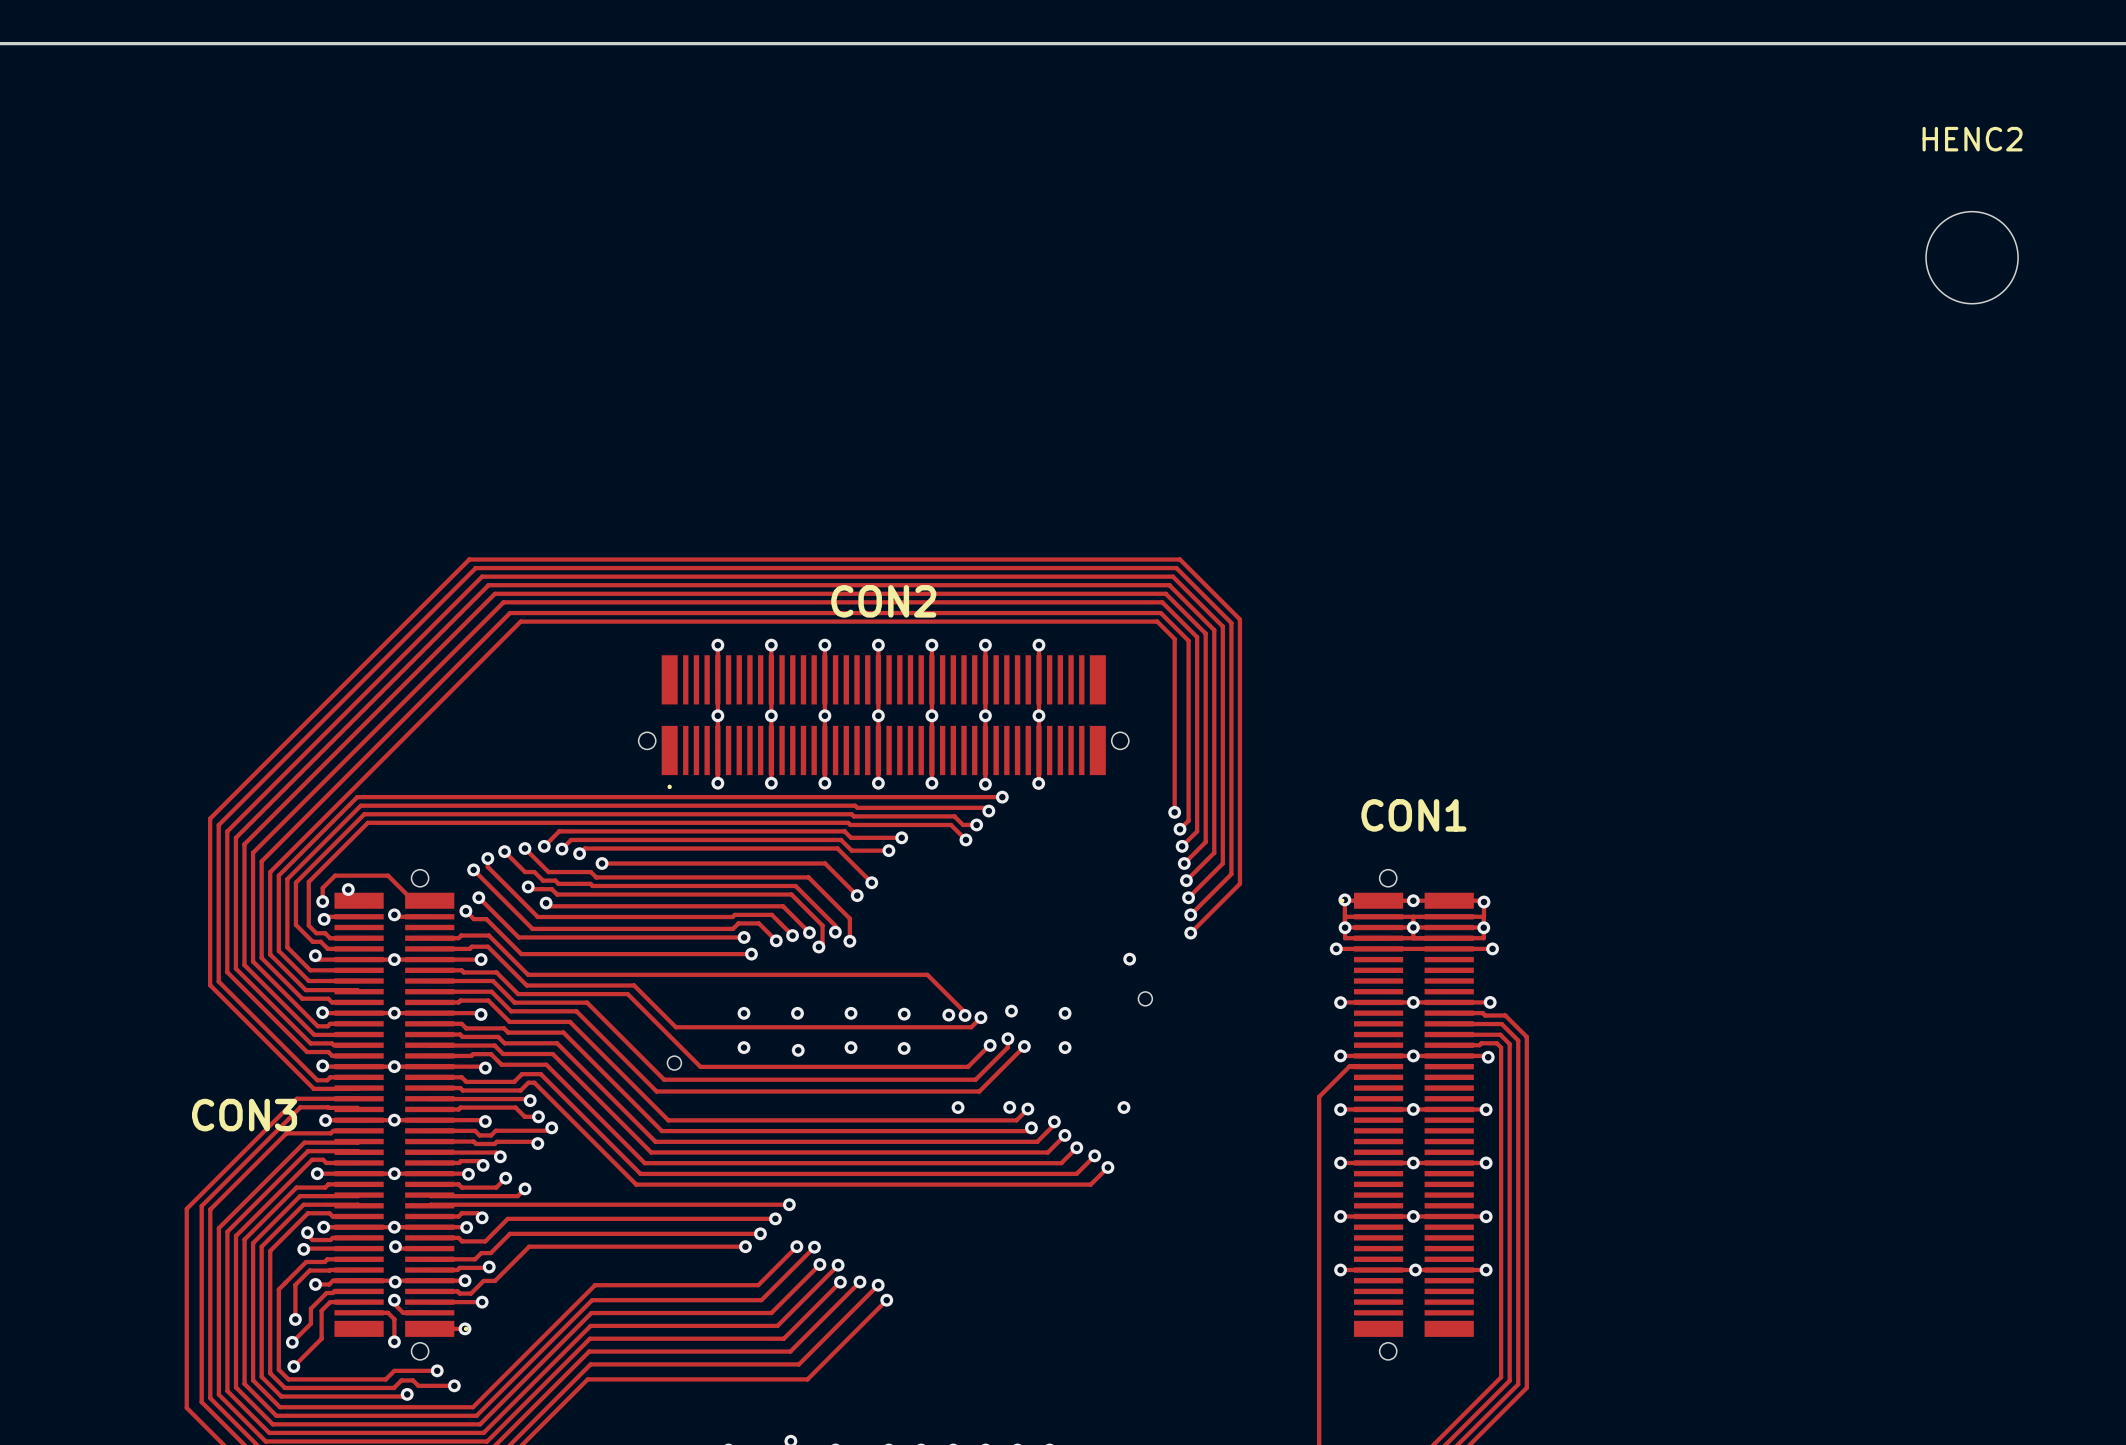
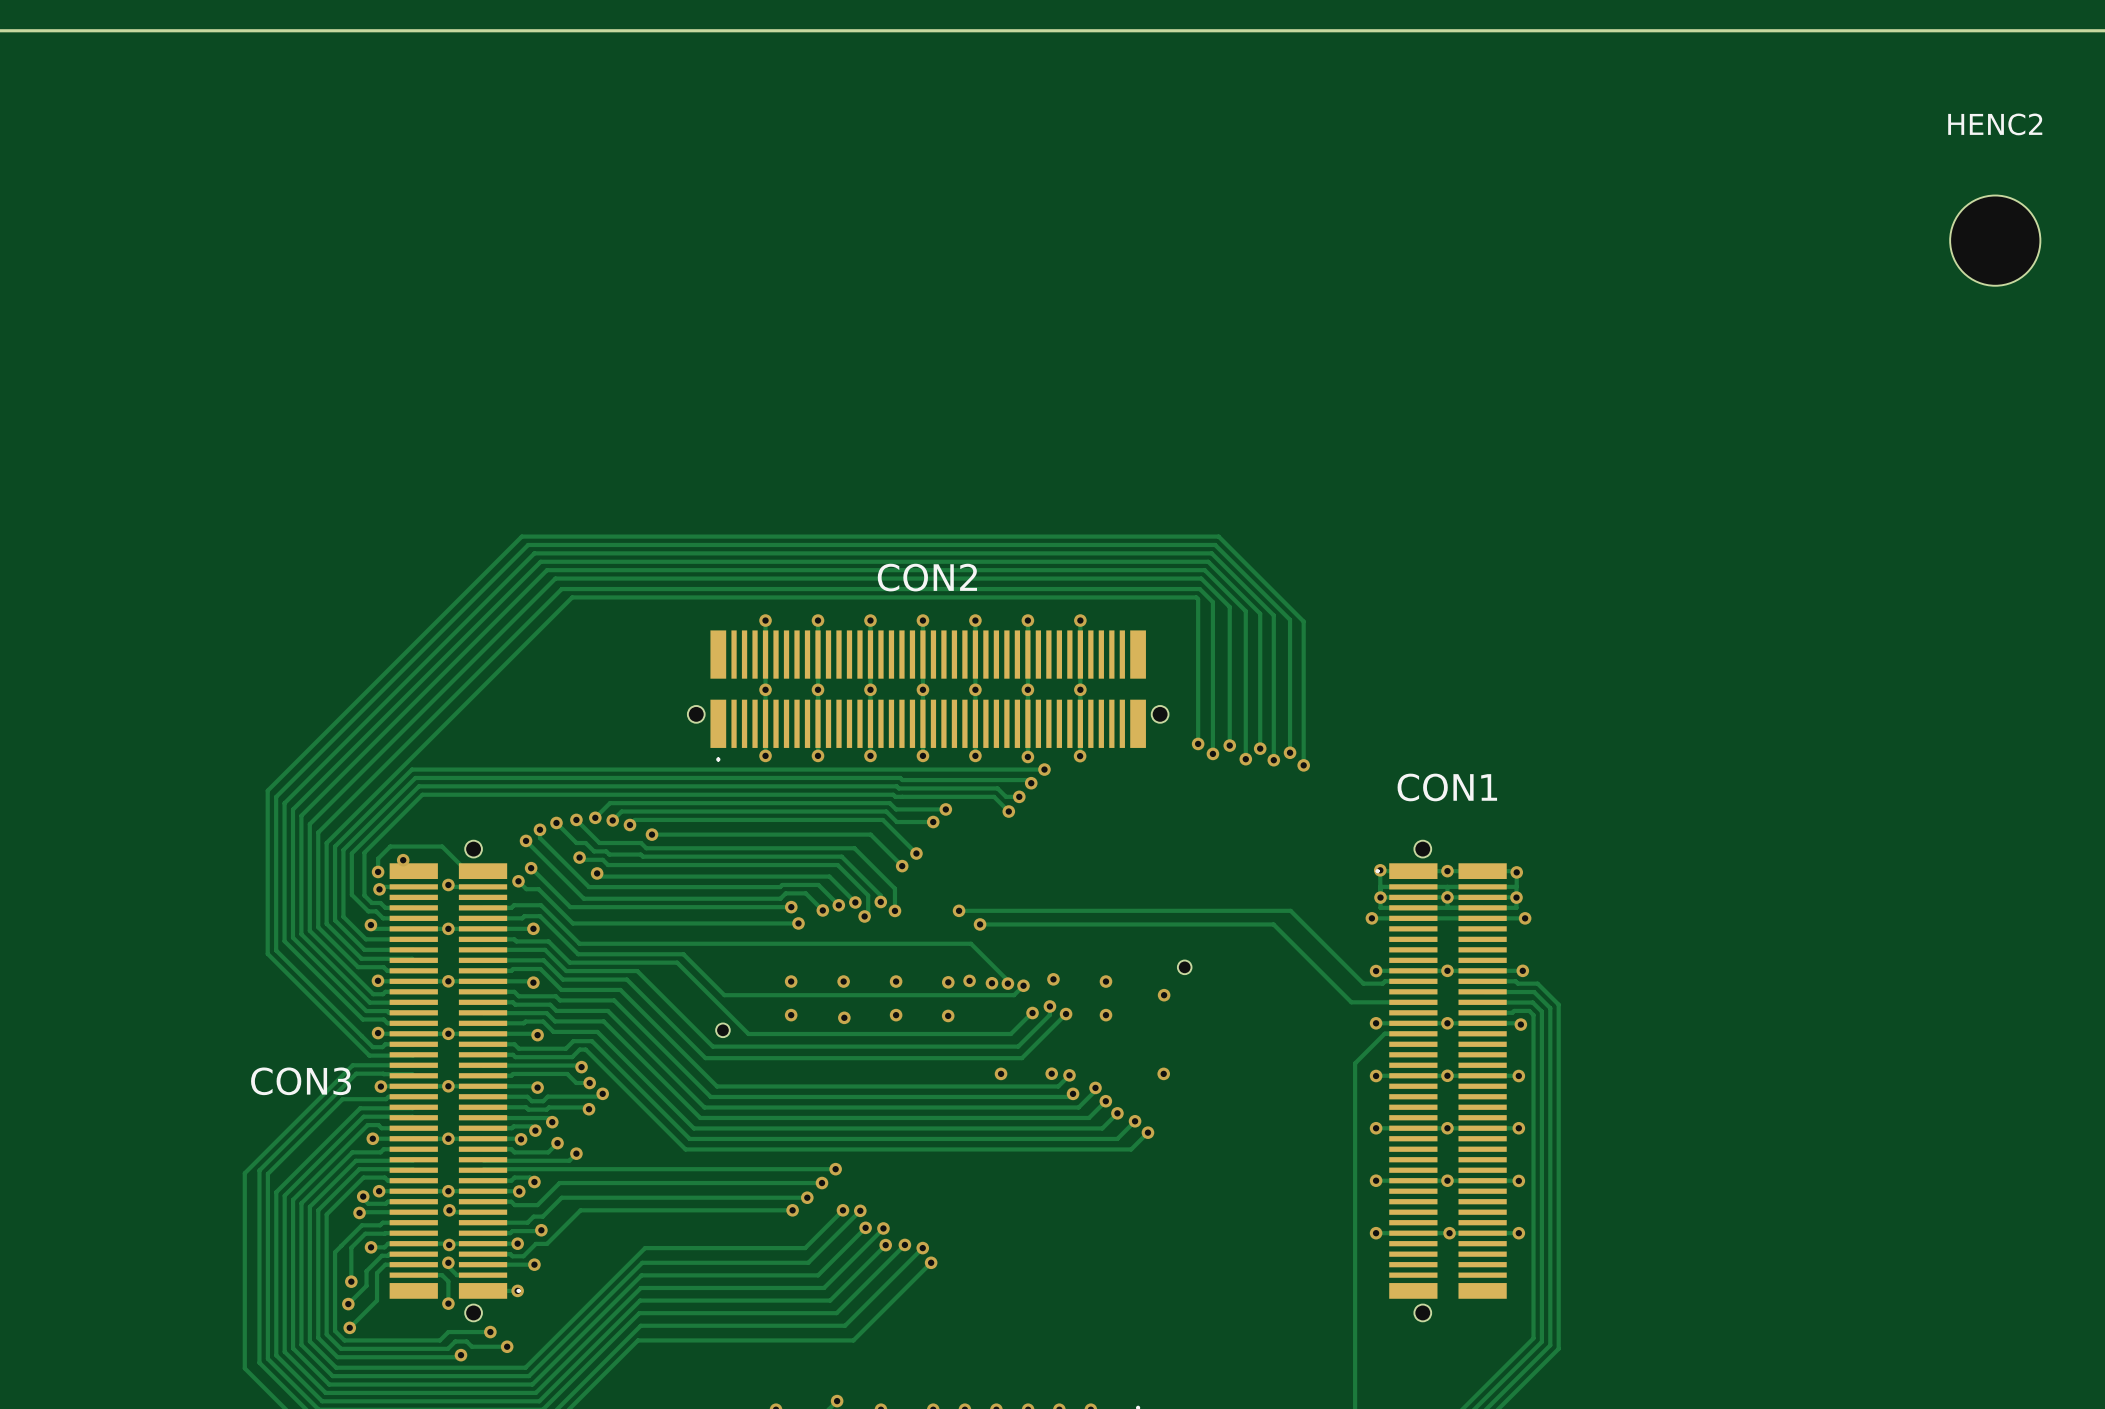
track: (1239, 619) (1239, 883) (1190, 933) -> (1277, 595) (1303, 621) (1303, 765)
track: (1159, 623) (1174, 639) (1174, 812) -> (1198, 599) (1198, 743)
track: (1231, 623) (1231, 874) (1190, 914) -> (1269, 598) (1290, 619) (1290, 752)
track: (1174, 626) (1188, 640) (1188, 820) (1180, 829) -> (1212, 602) (1212, 753)
track: (1222, 626) (1222, 863) (1188, 897) -> (1260, 602) (1273, 615) (1273, 760)
track: (1214, 630) (1214, 852) (1186, 880) -> (1252, 605) (1260, 613) (1260, 748)
track: (1191, 631) (1197, 637) (1197, 831) (1182, 846) -> (1229, 607) (1229, 745)
track: (1205, 633) (1205, 842) (1184, 863) -> (1243, 609) (1245, 611) (1245, 759)
via: none -> (1198, 743)
via: none -> (1229, 745)
via: none -> (1260, 748)
via: none -> (1290, 752)
via: none -> (1212, 753)
via: none -> (1245, 759)
via: none -> (1273, 760)
via: none -> (1303, 765)
via: (1174, 812) -> none
via: (1180, 829) -> none
via: (1182, 846) -> none
via: (1184, 863) -> none
via: (1186, 880) -> none
via: (1188, 897) -> none
via: (1190, 914) -> none
via: (1190, 933) -> none
track: none -> (959, 910) (1290, 910) (1363, 983) (1413, 981)
via: none -> (959, 910)
track: none -> (980, 924) (1273, 924) (1351, 1002) (1413, 1002)
via: none -> (980, 924)
via: (1129, 959) -> none
via: none -> (969, 980)
via: none -> (1164, 995)

